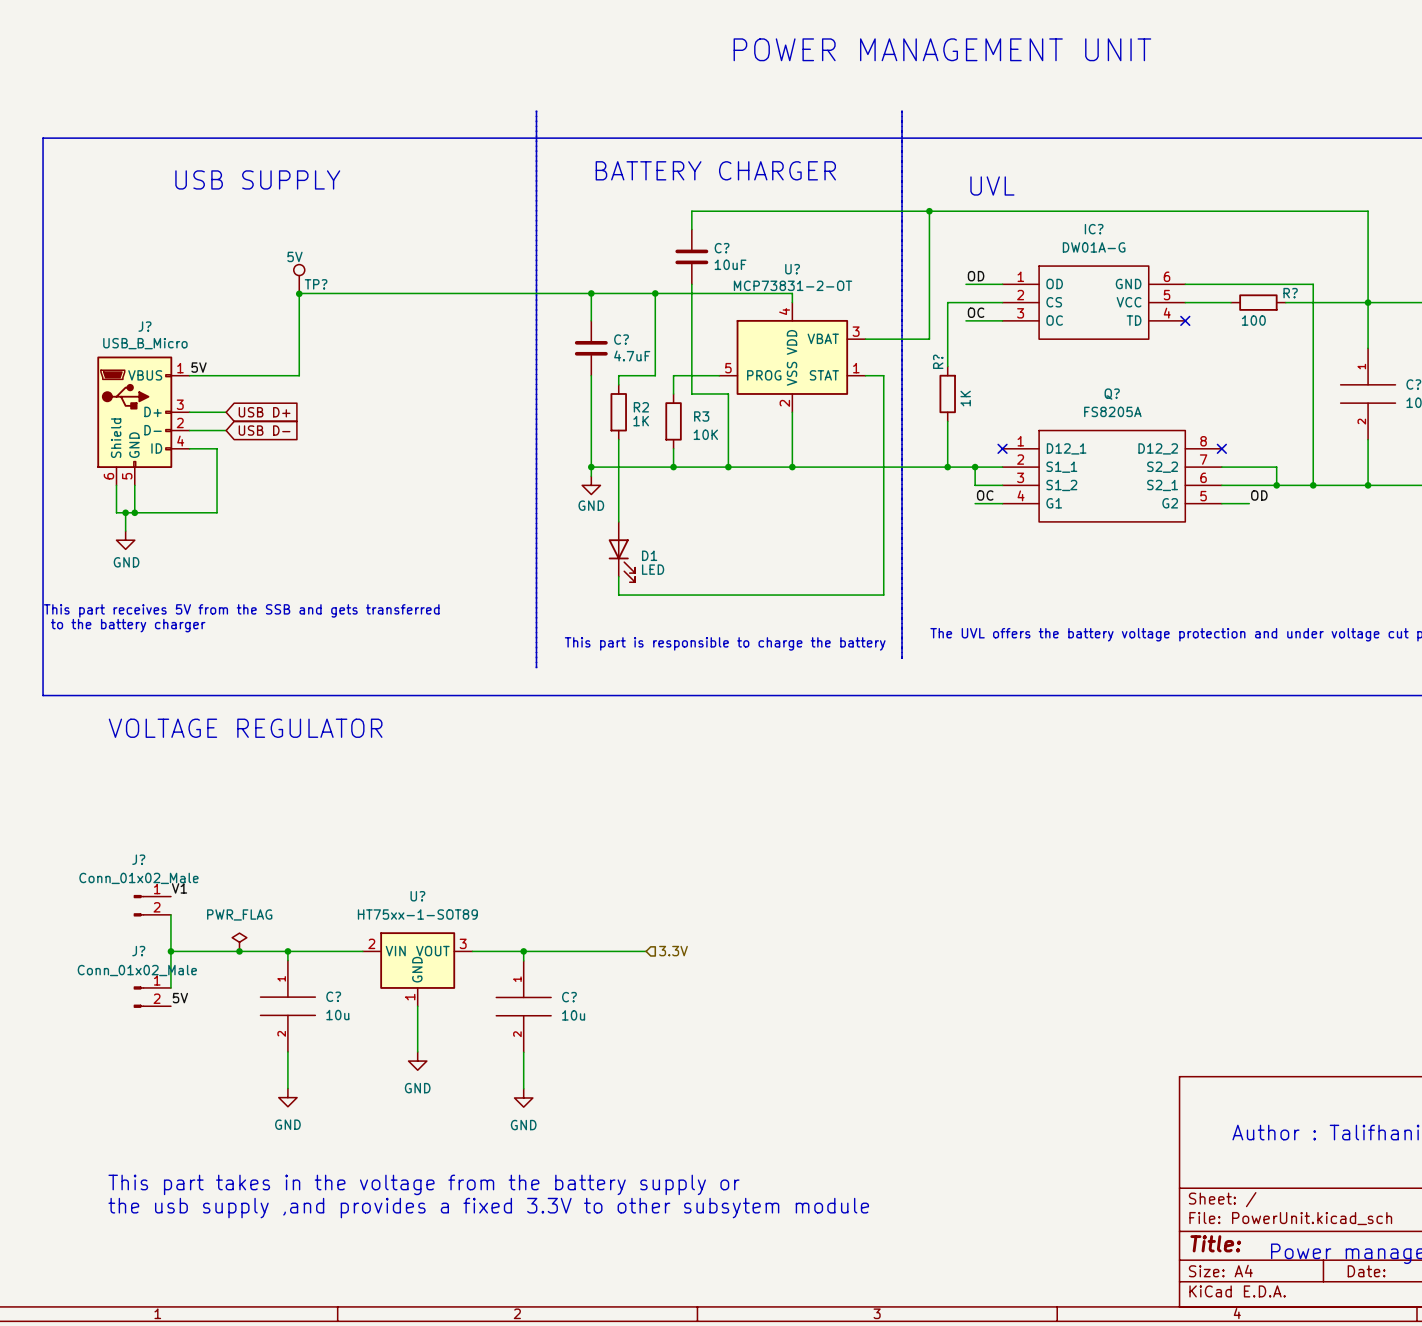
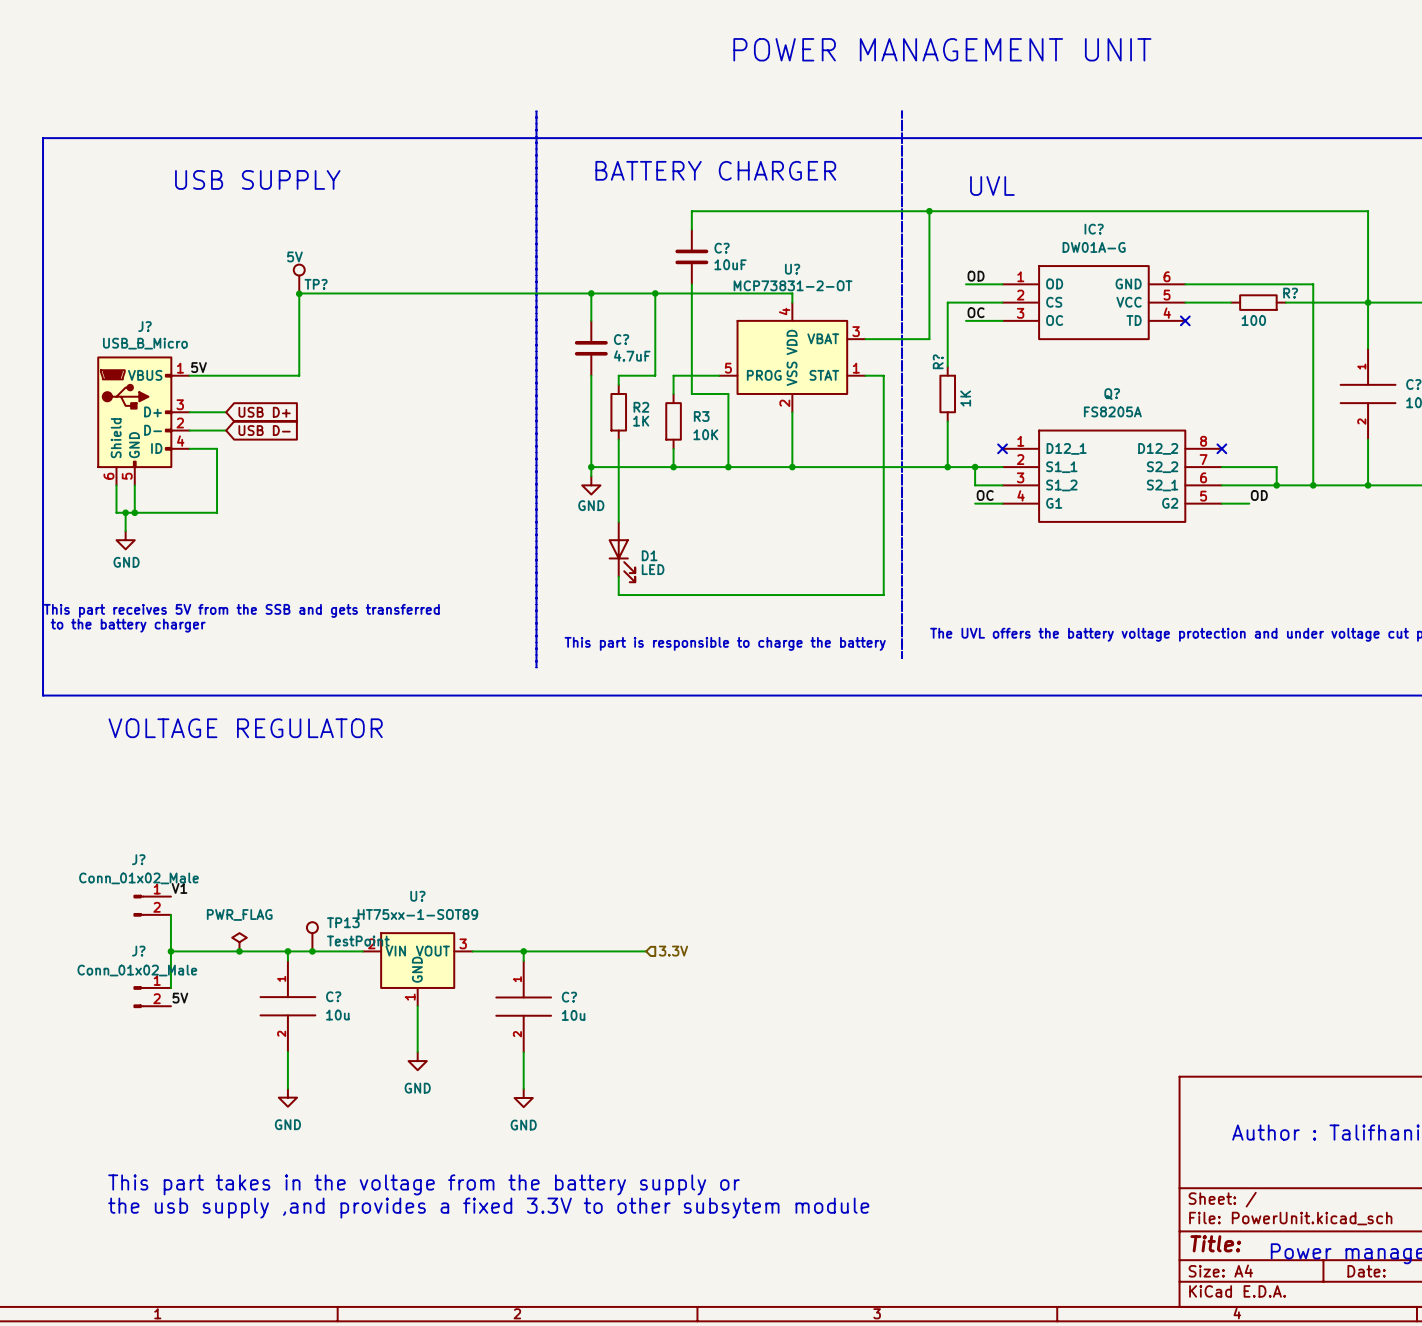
TP13: none -> TestPoint (312, 936)
junction: none -> (312, 951)

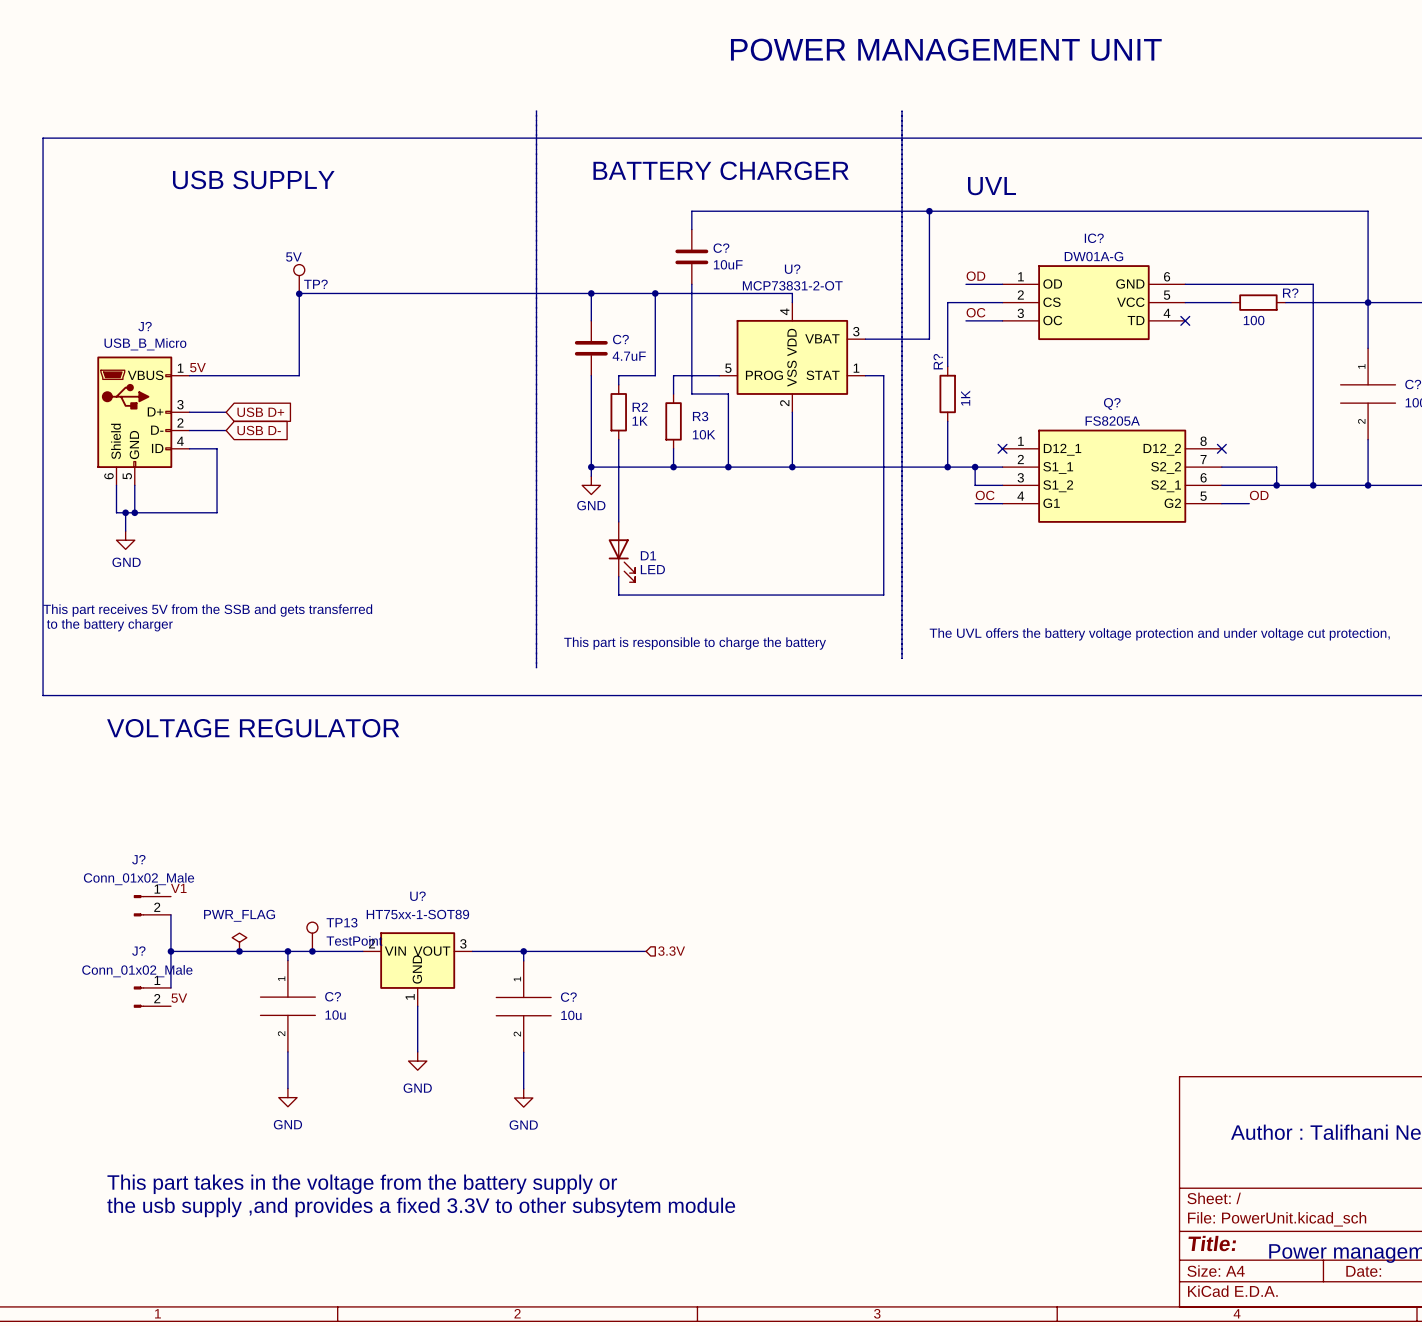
IC? symbol: [1002, 265, 1186, 340] -> [1002, 265, 1186, 341]
Q? symbol: [1002, 429, 1222, 523] -> [1002, 429, 1222, 523]

